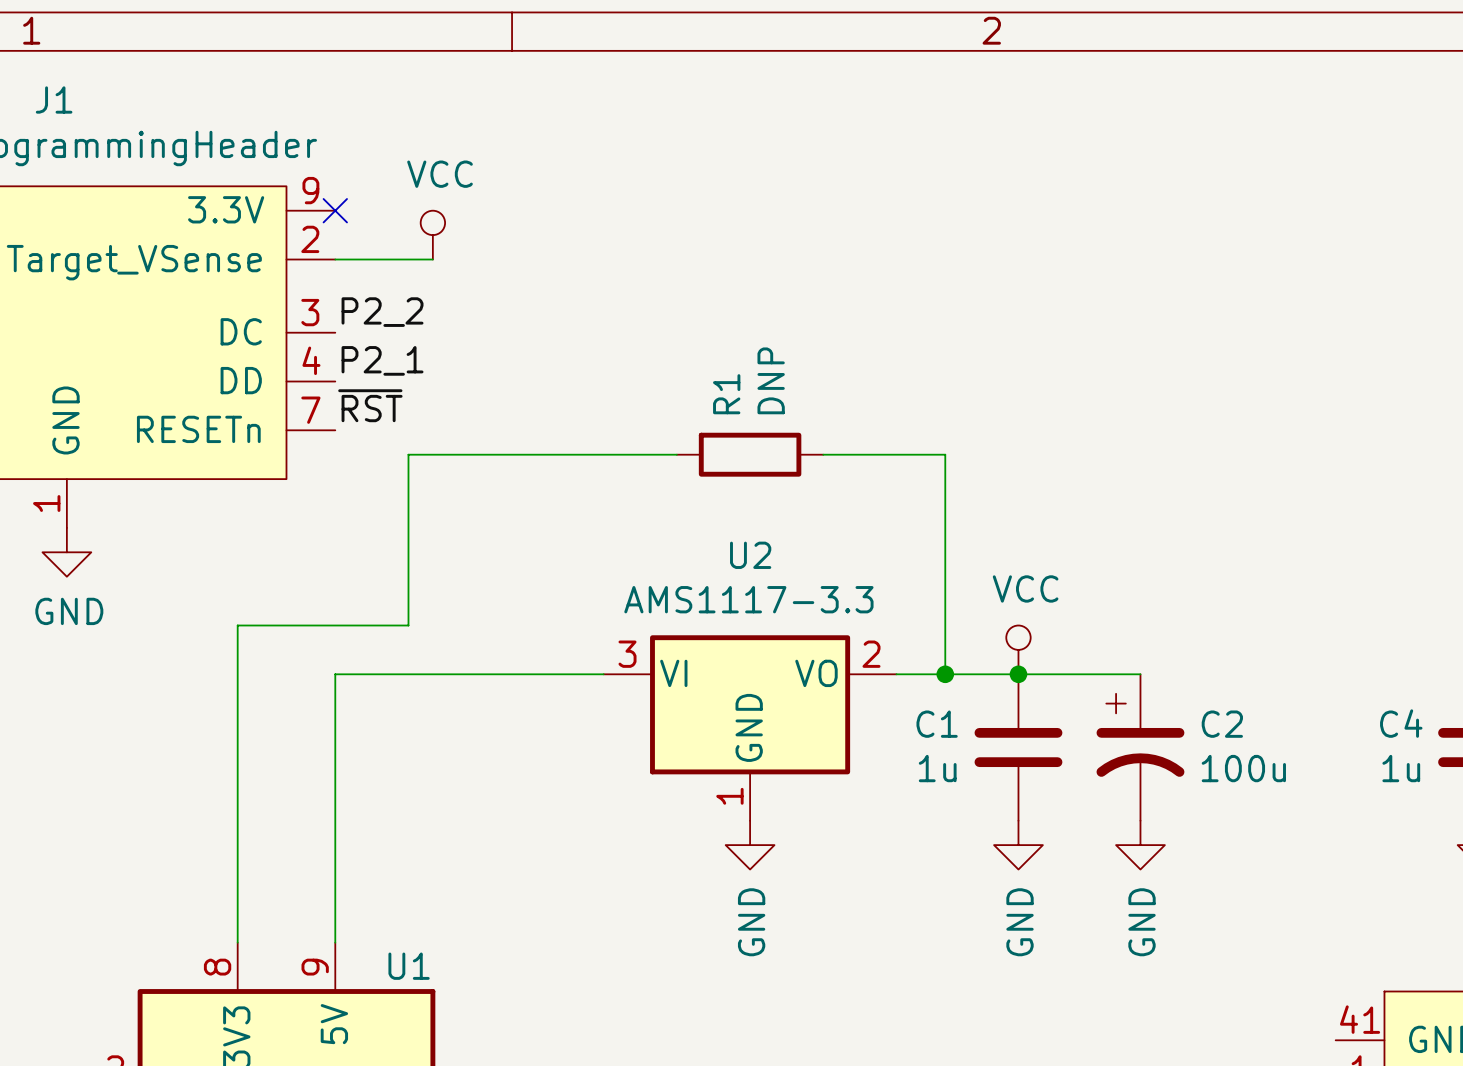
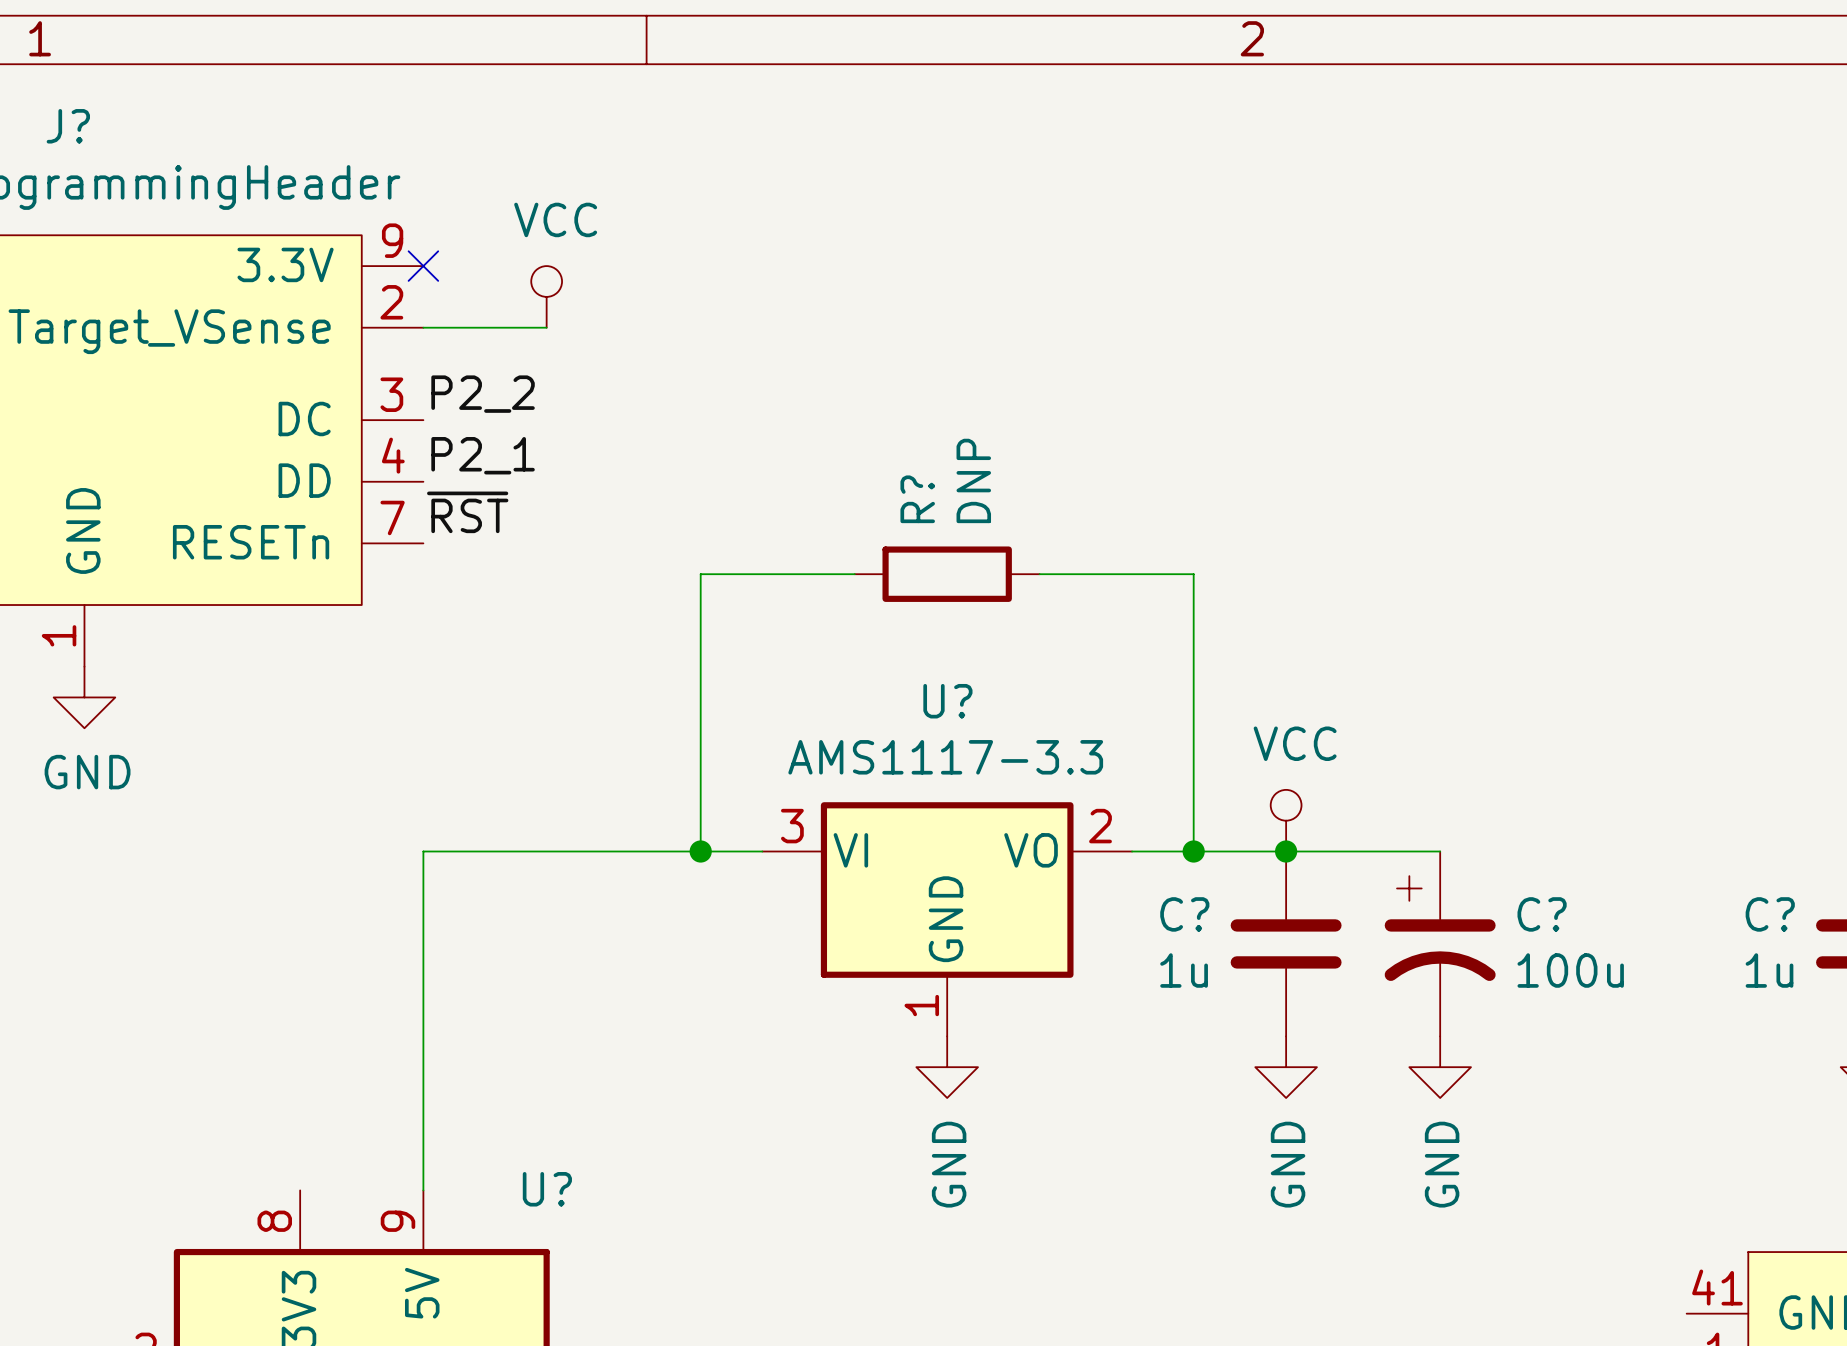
J1 name: J1 (54, 100) -> J? (68, 126)
R1 name: R1 (726, 394) -> R? (917, 499)
wire: (554, 454) (408, 454) (408, 625) (237, 625) (237, 942) -> (700, 574) (700, 851)
U2 name: U2 (750, 555) -> U? (947, 701)
junction: none -> (700, 851)
C4 name: C4 (1401, 723) -> C? (1770, 914)
C1 name: C1 (937, 724) -> C? (1184, 914)
C2 name: C2 (1222, 724) -> C? (1542, 914)
U1 name: U1 (409, 966) -> U? (547, 1189)

